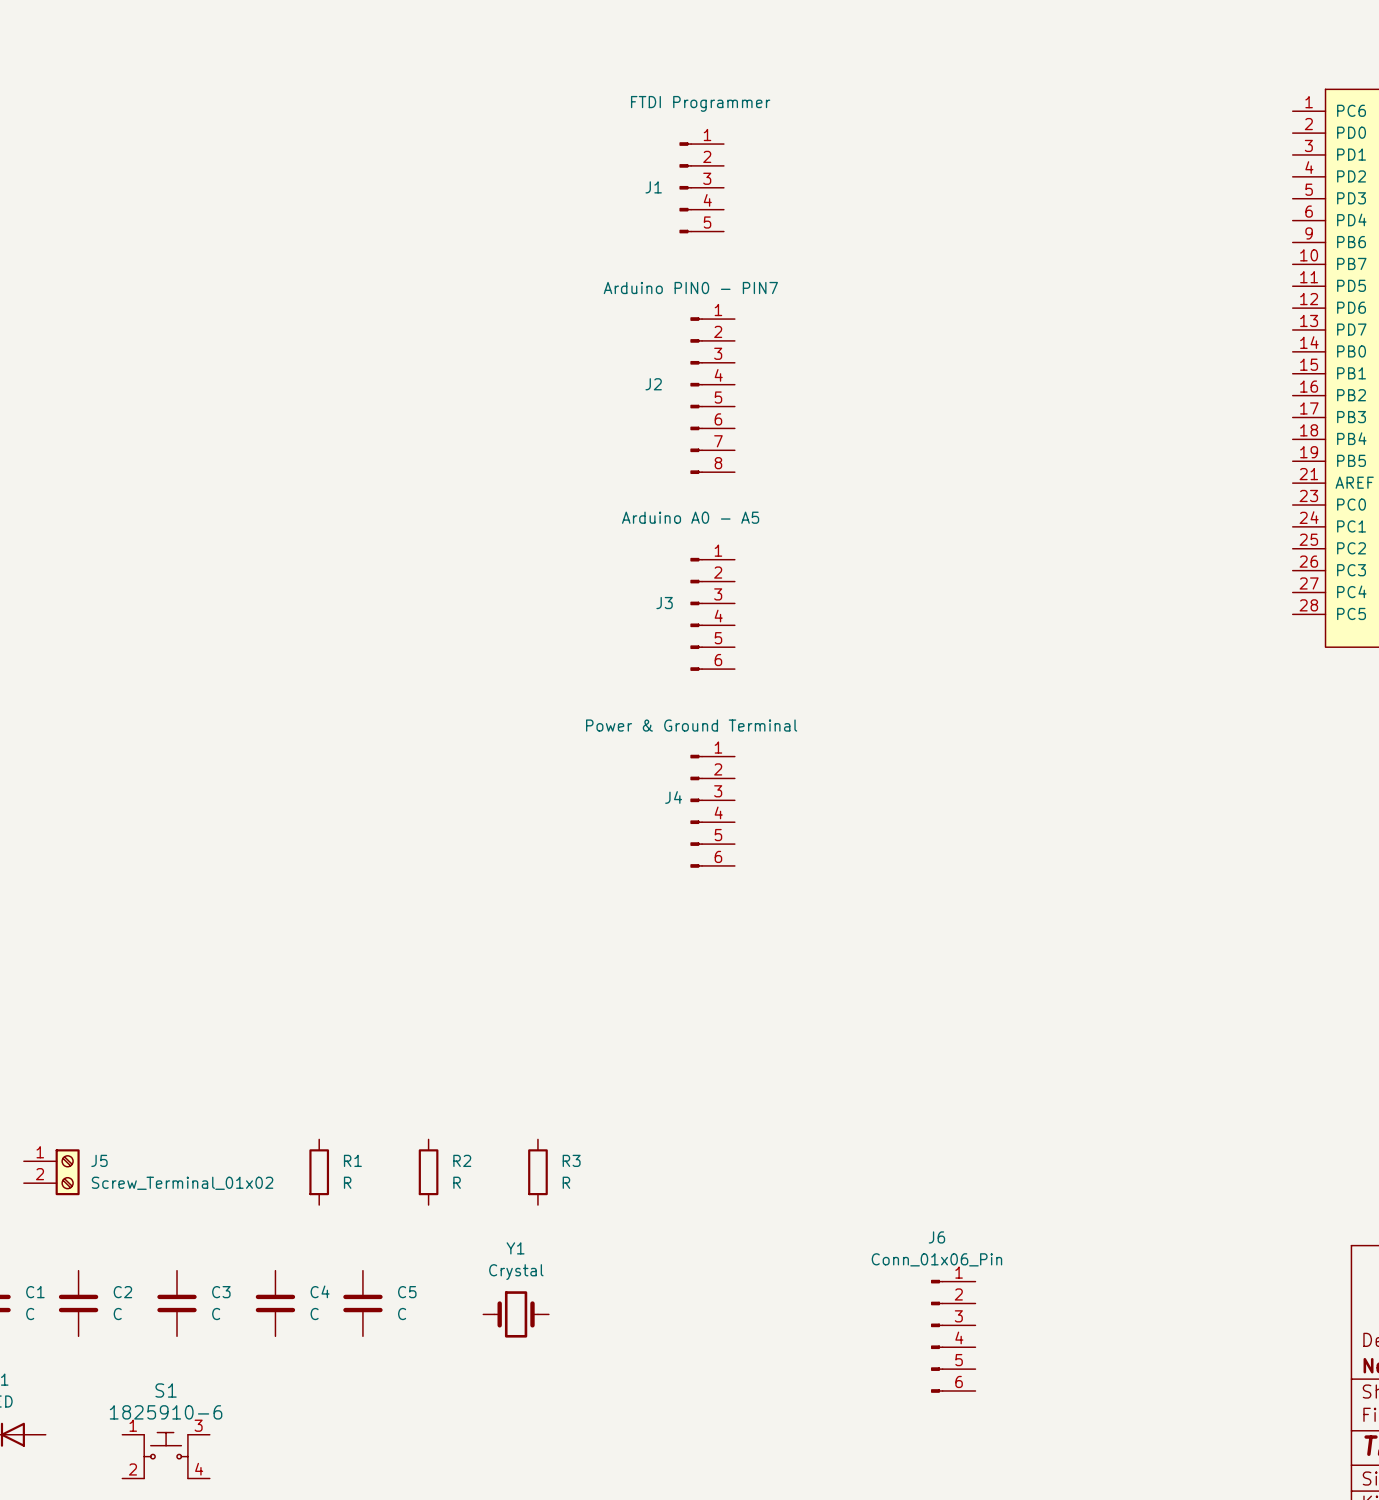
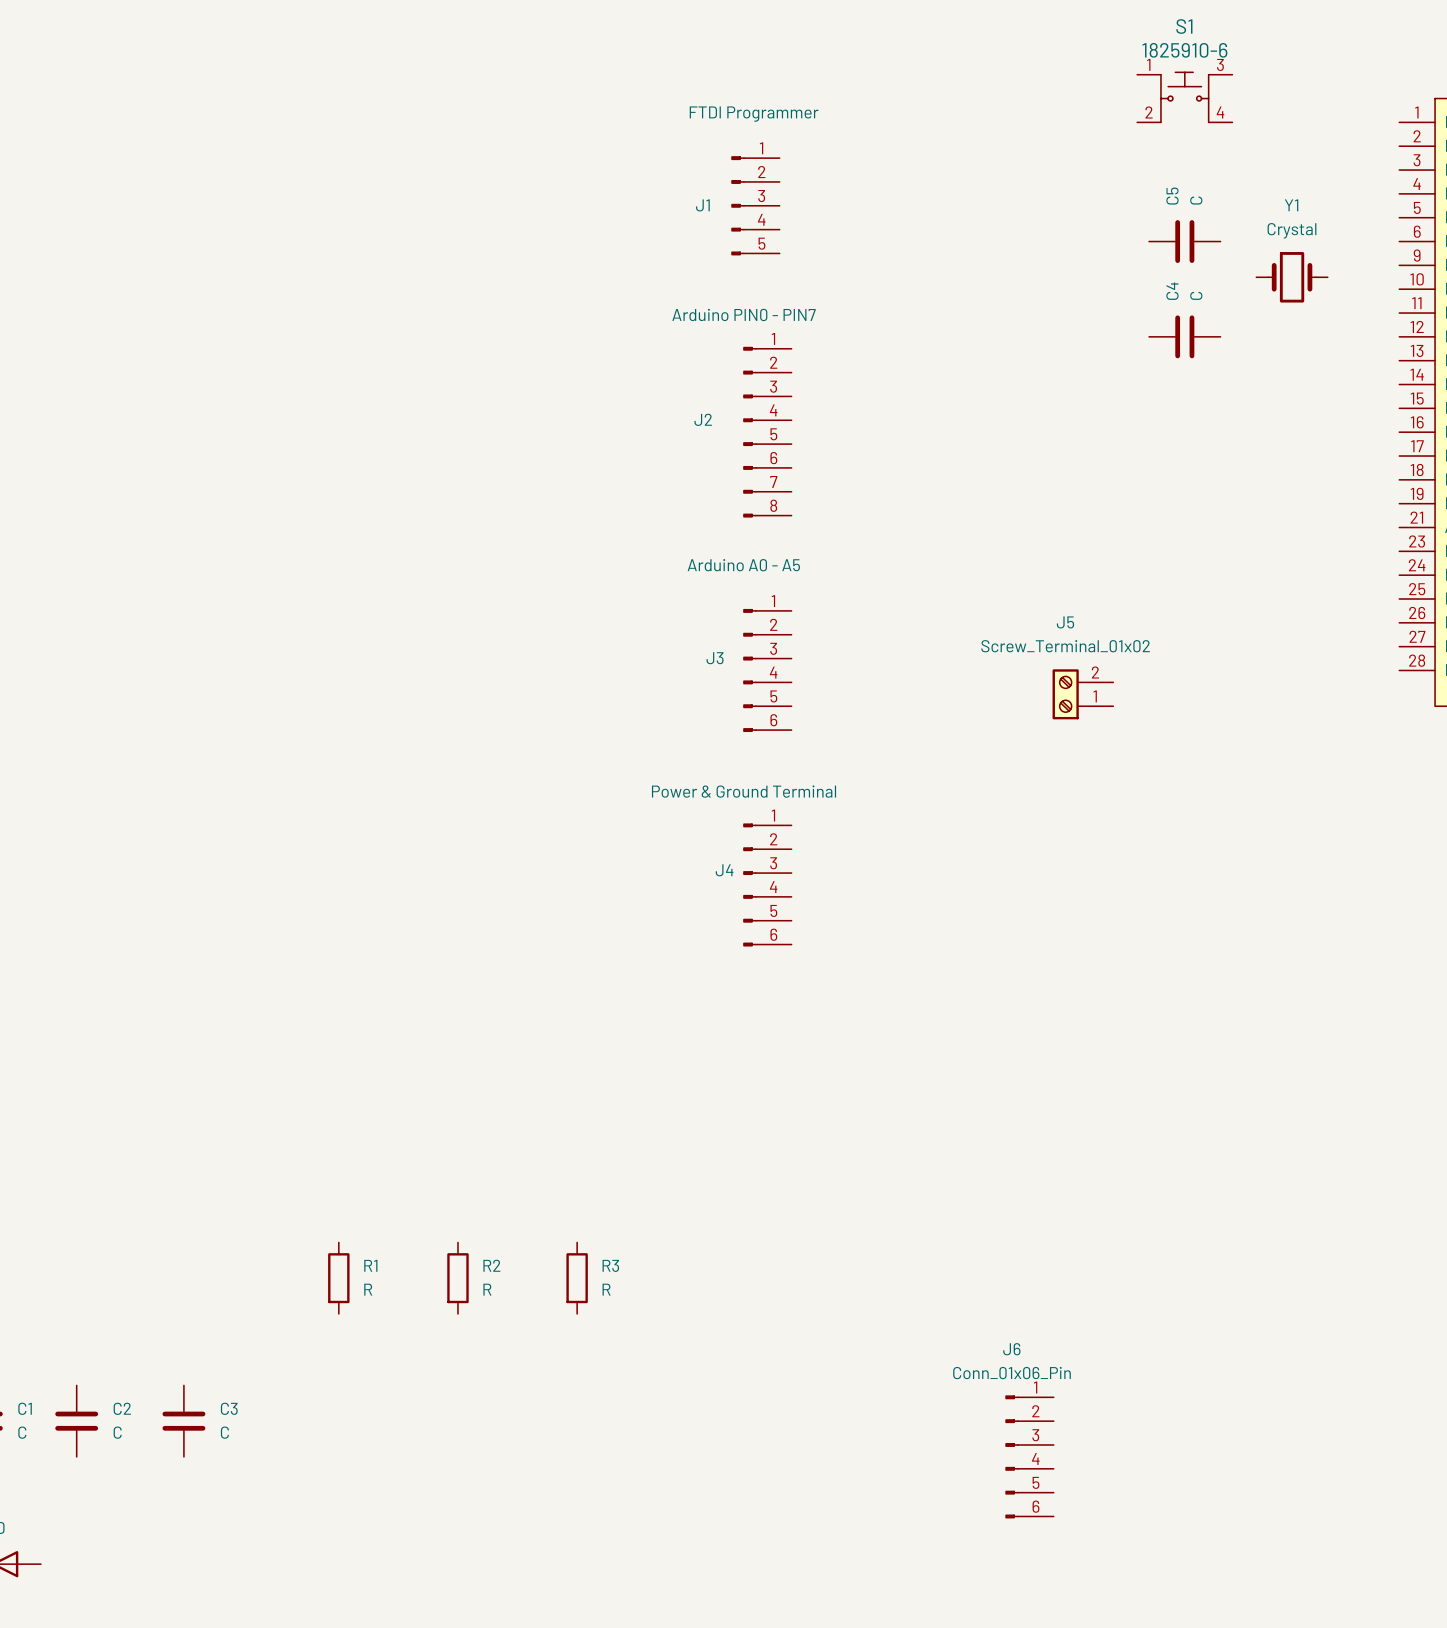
J5 name position: J5 (99, 1160) -> J5 (1065, 622)
J5 position: (51, 1172) -> (1082, 694)
J5 rotation: 0° (67, 1172) -> 180° (1065, 694)
J5 value position: Screw_Terminal_01x02 (182, 1183) -> Screw_Terminal_01x02 (1065, 646)
C4 name position: C4 (320, 1291) -> C4 (1172, 291)
C5 name position: C5 (407, 1292) -> C5 (1172, 196)
C4 rotation: 0° (275, 1303) -> 90° clockwise (1184, 336)
C4 position: (275, 1303) -> (1184, 336)
C5 rotation: 0° (362, 1303) -> 90° clockwise (1184, 241)
C5 position: (362, 1303) -> (1184, 241)
C4 value position: C (314, 1314) -> C (1196, 295)
C5 value position: C (402, 1314) -> C (1196, 200)
Y1 position: (516, 1314) -> (1292, 277)
S1 position: (166, 1455) -> (1184, 97)

